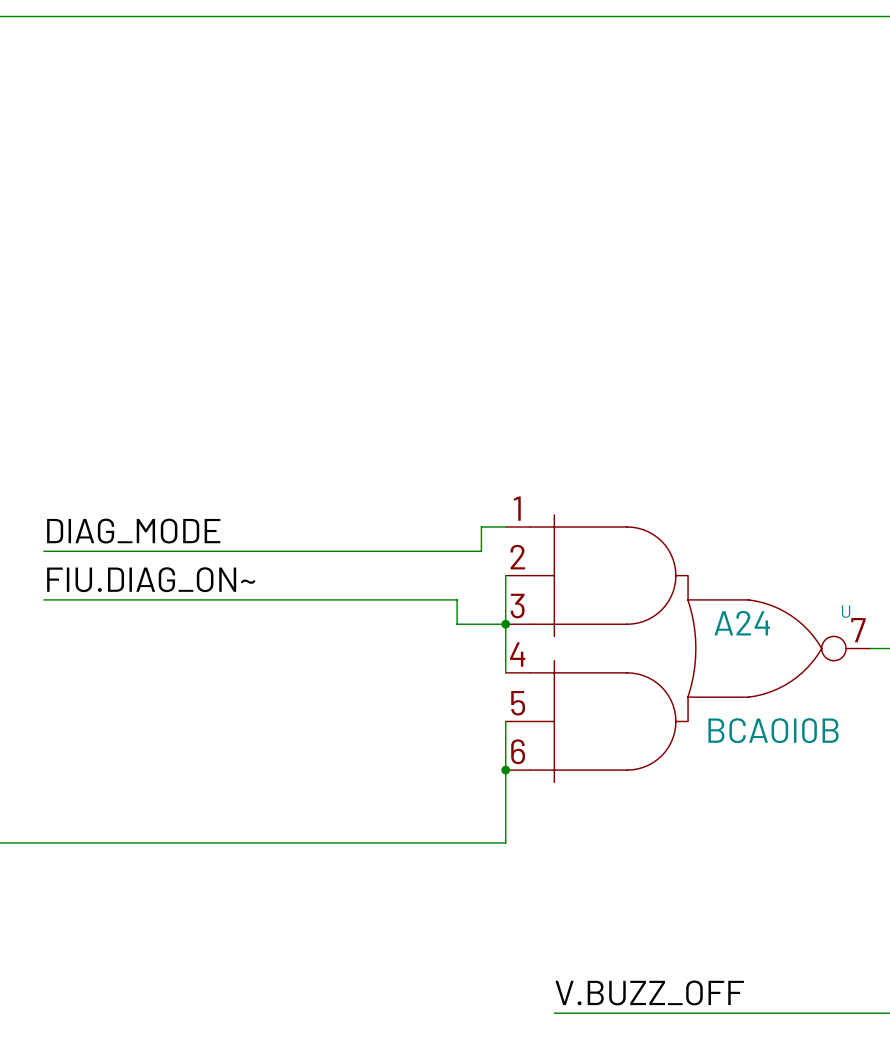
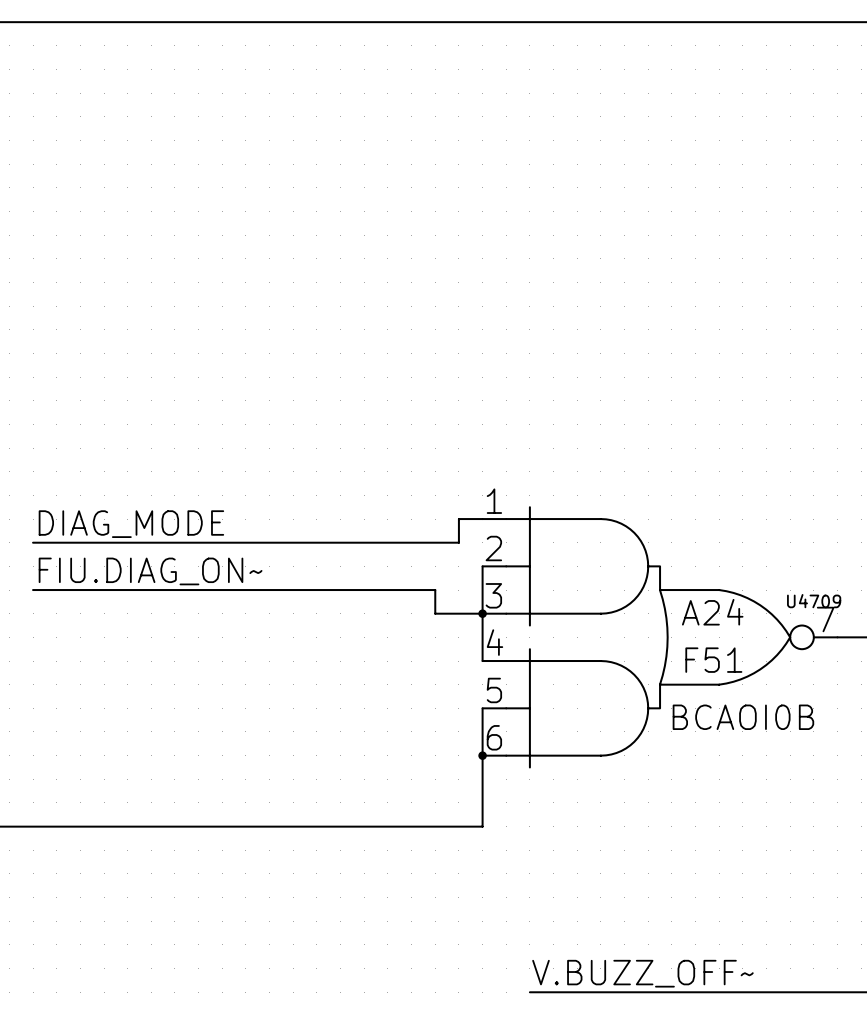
U name: U (846, 611) -> U4709 (814, 601)
U value: none -> F51 (713, 660)
label: V.BUZZ_OFF (649, 992) -> V.BUZZ_OFF~ (642, 973)

